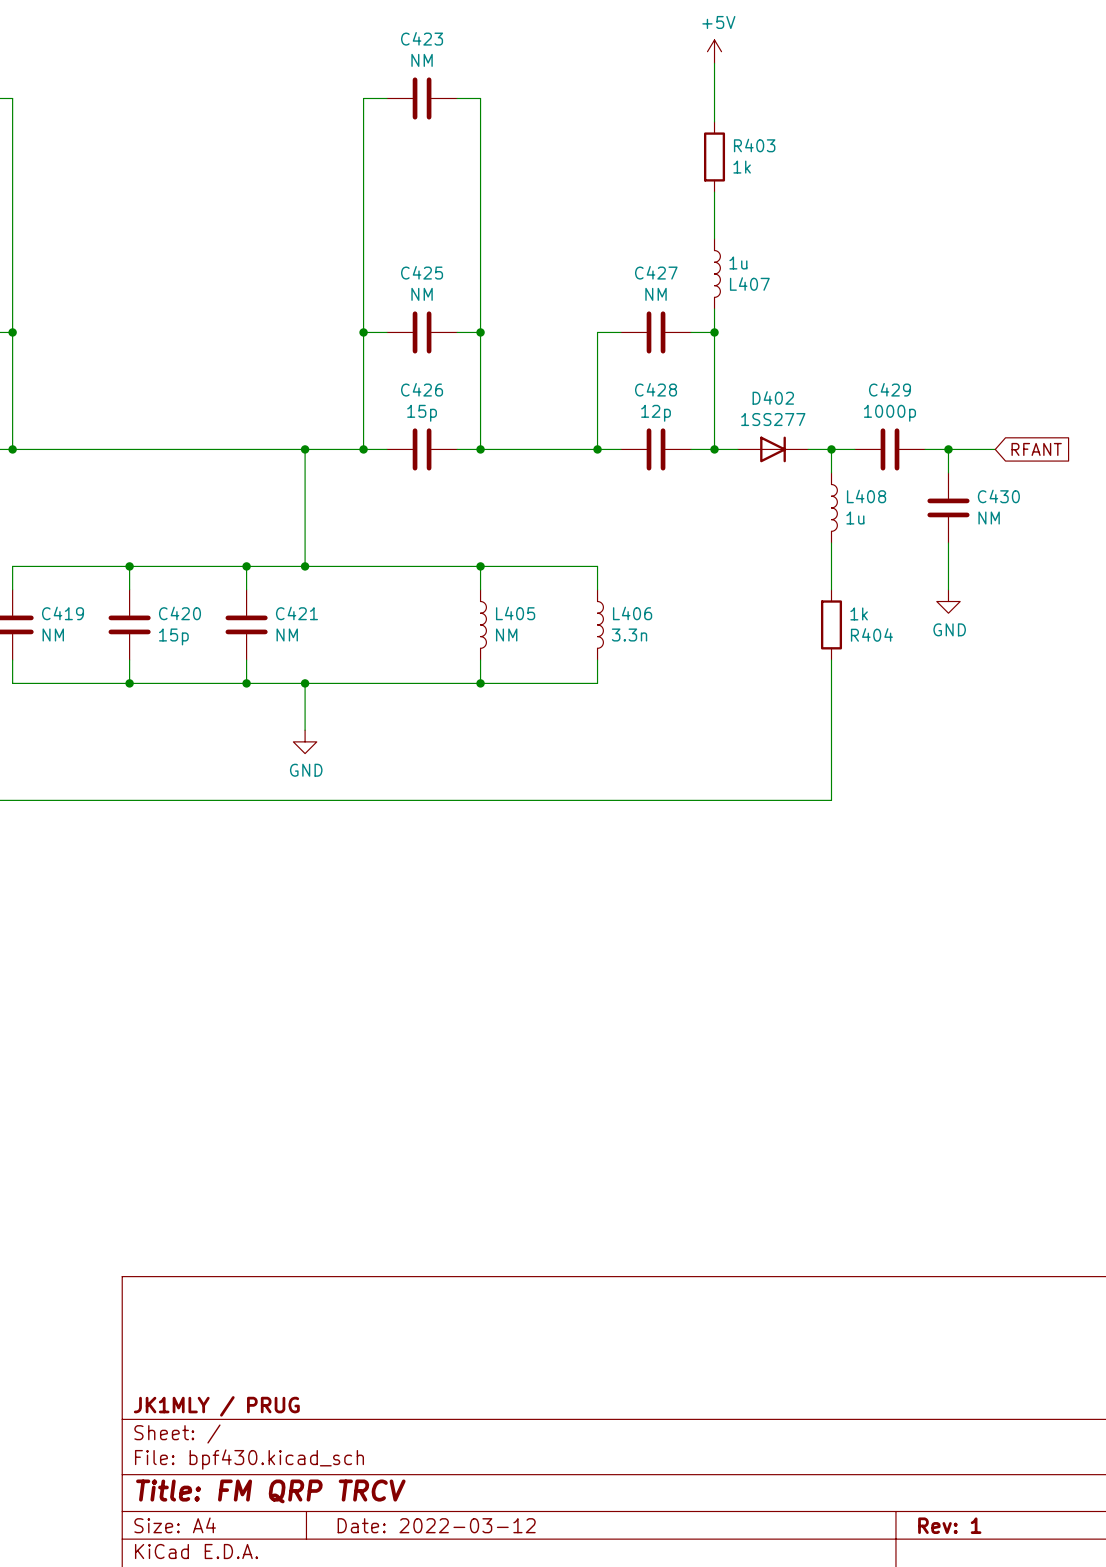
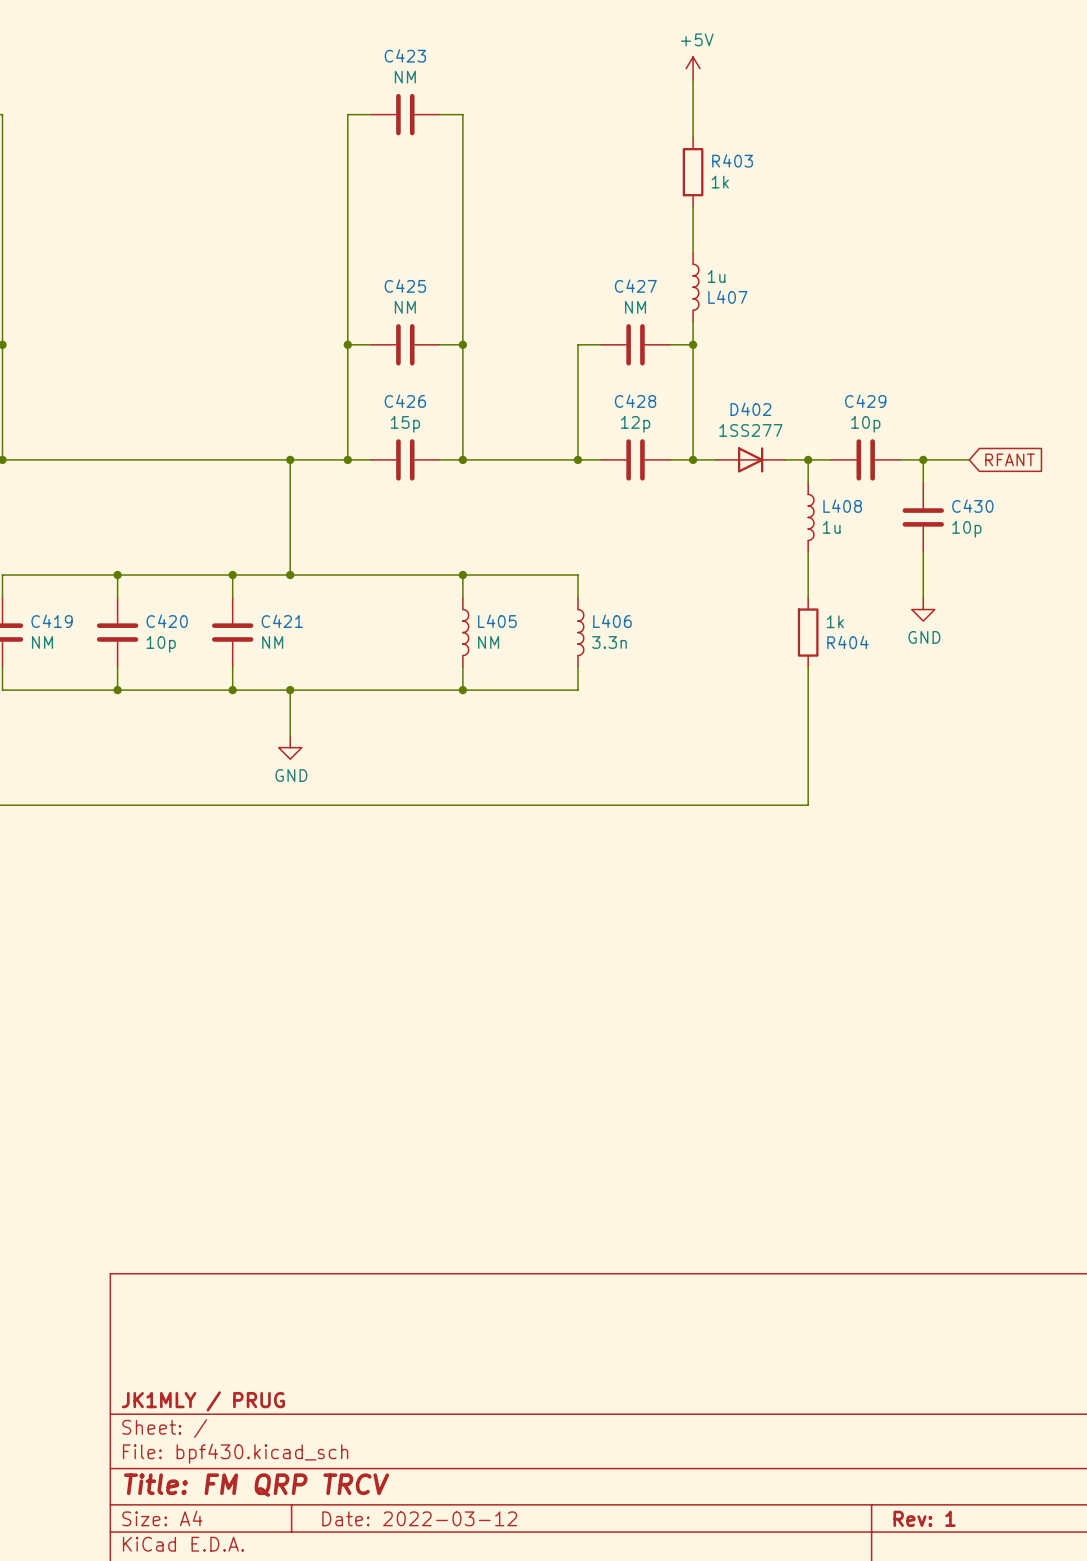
C429 value: 1000p (889, 413) -> 10p (865, 424)
C430 value: NM (989, 518) -> 10p (966, 529)
C420 value: 15p (173, 636) -> 10p (161, 644)

